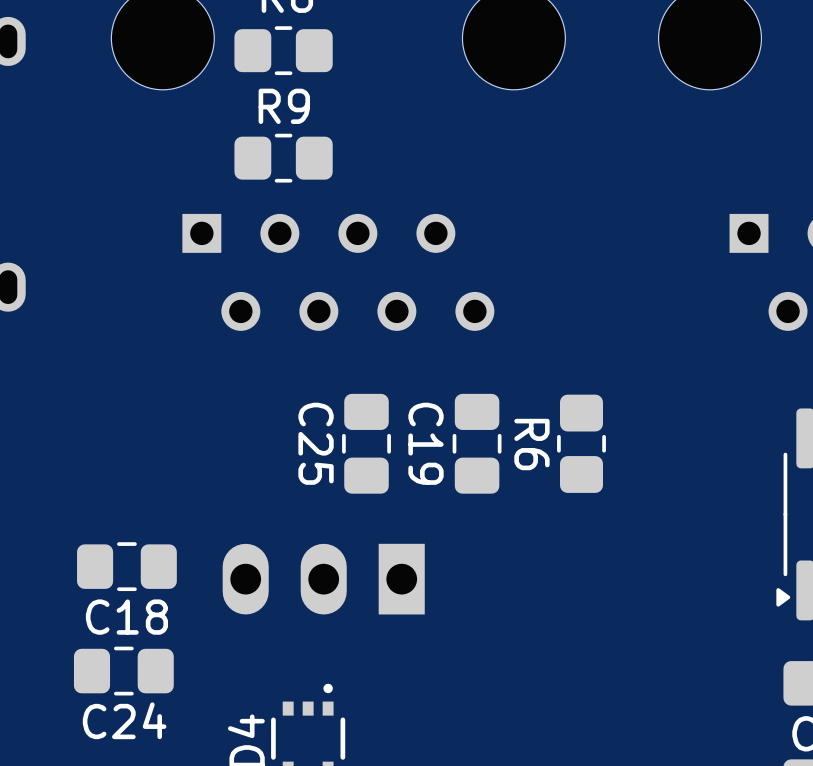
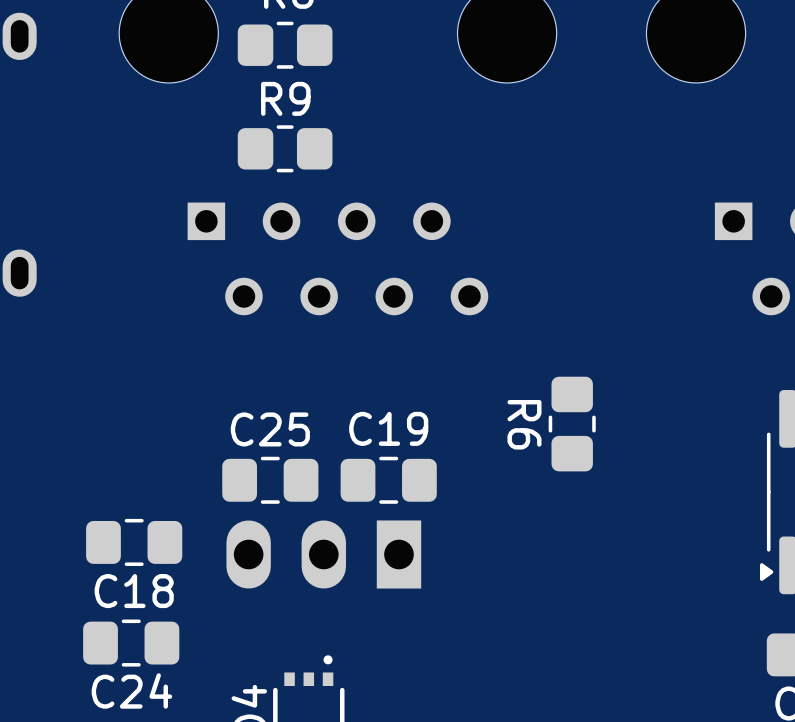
C25 rotation: 0° (366, 443) -> 90° clockwise (270, 480)
C25 position: (366, 443) -> (270, 480)
C19 rotation: 0° (477, 443) -> 90° clockwise (388, 480)
C19 position: (477, 443) -> (388, 480)

